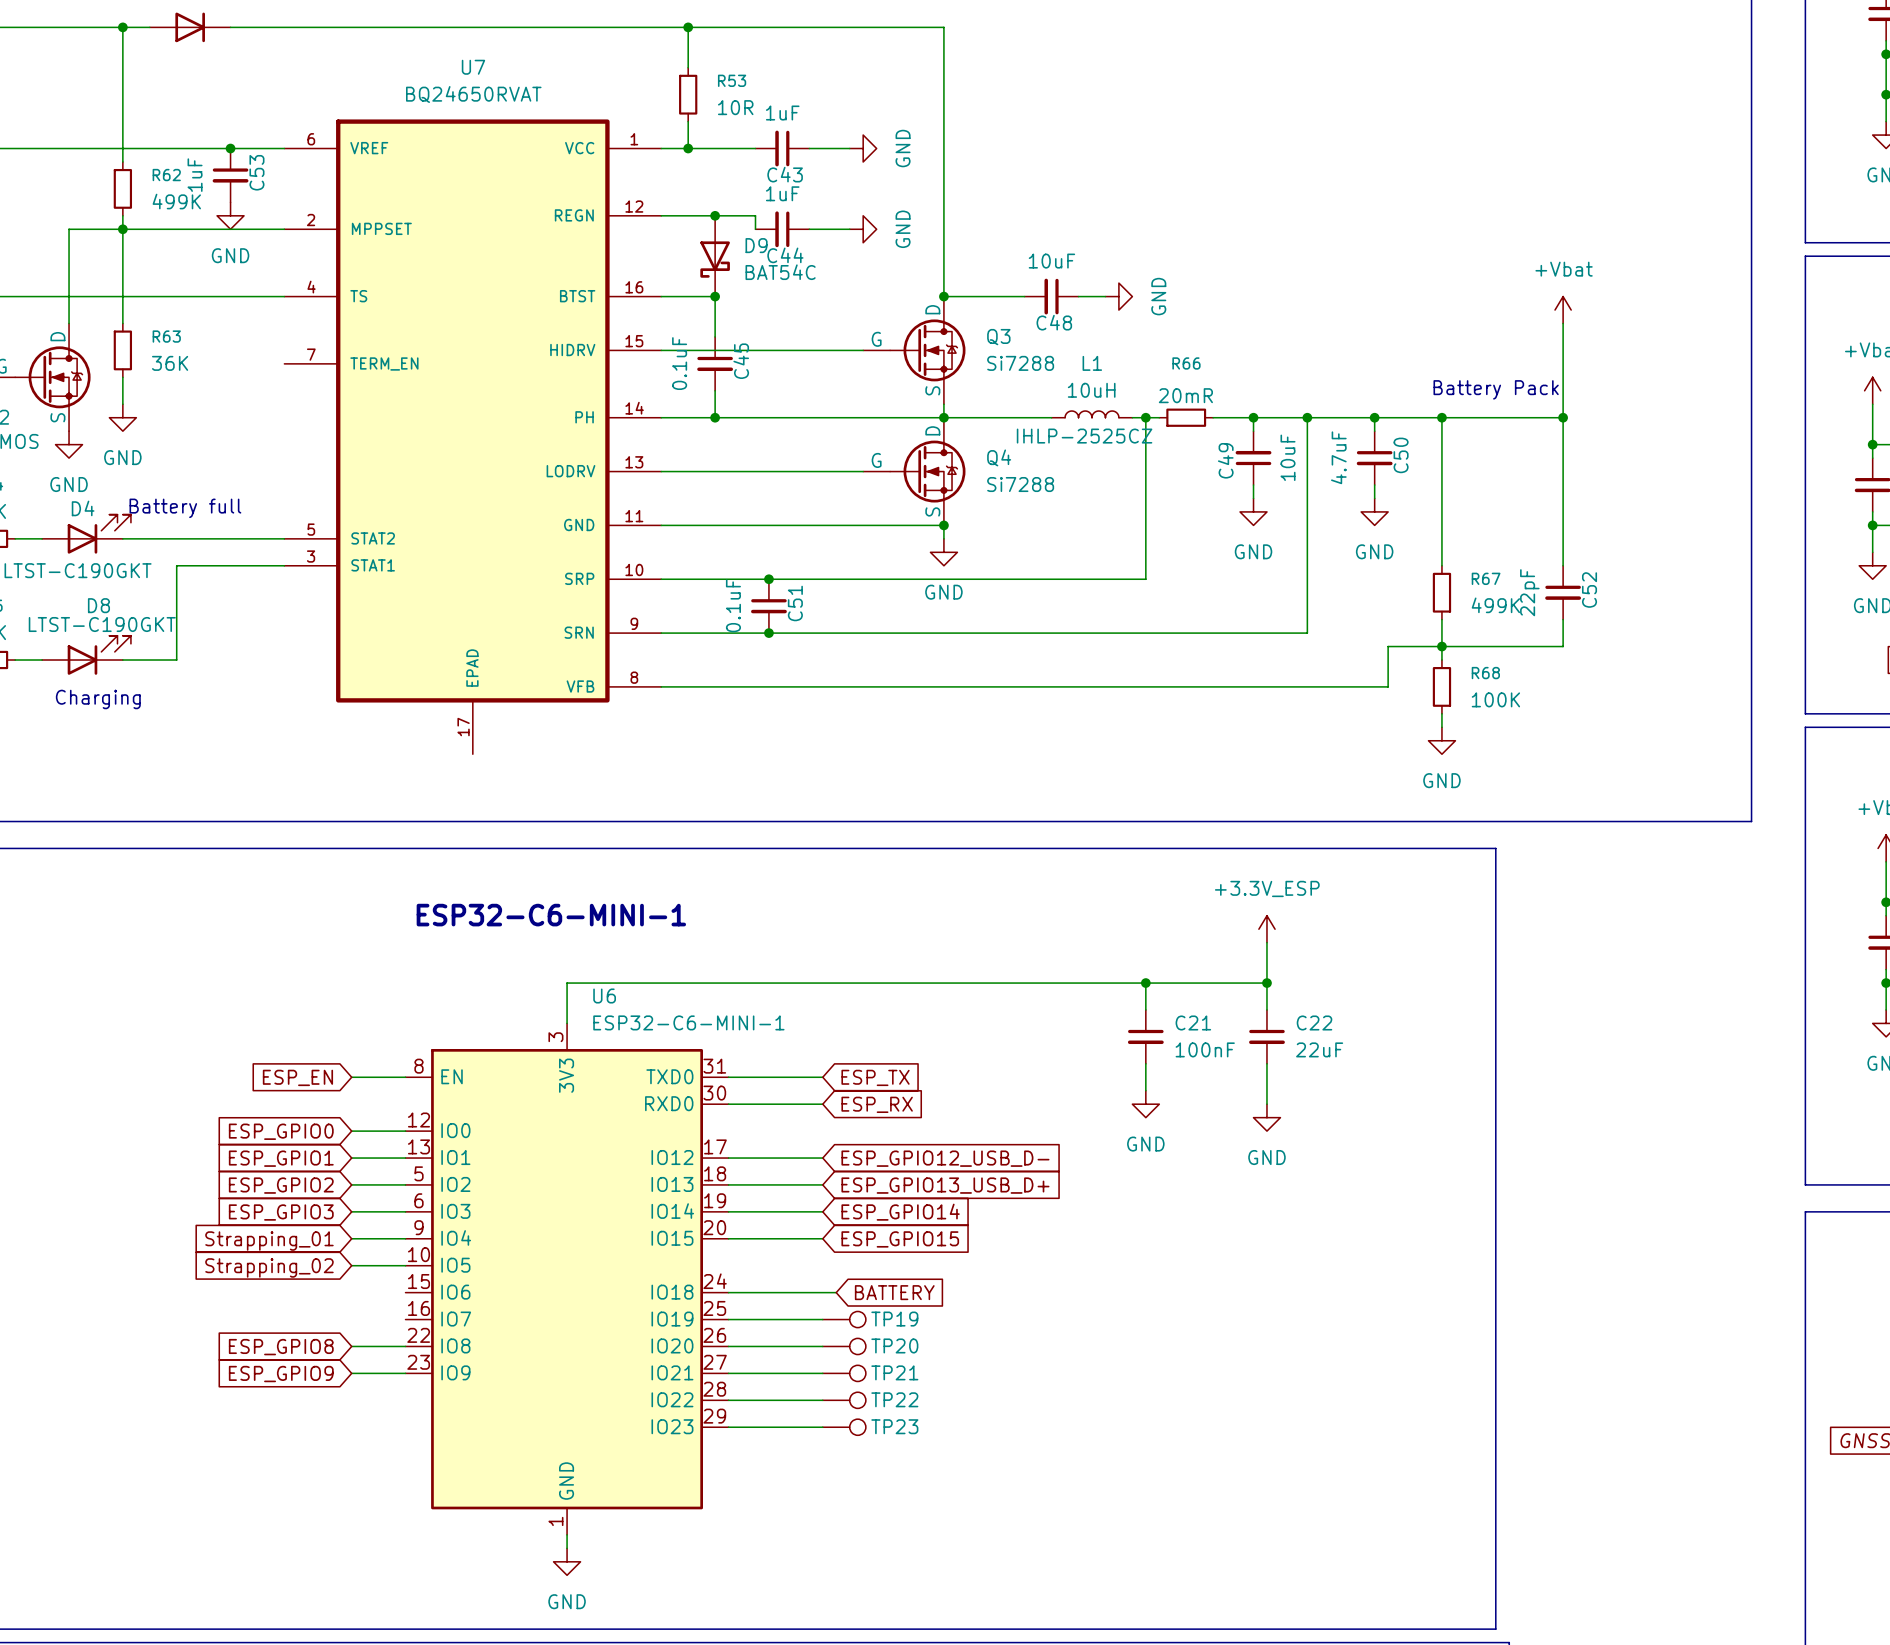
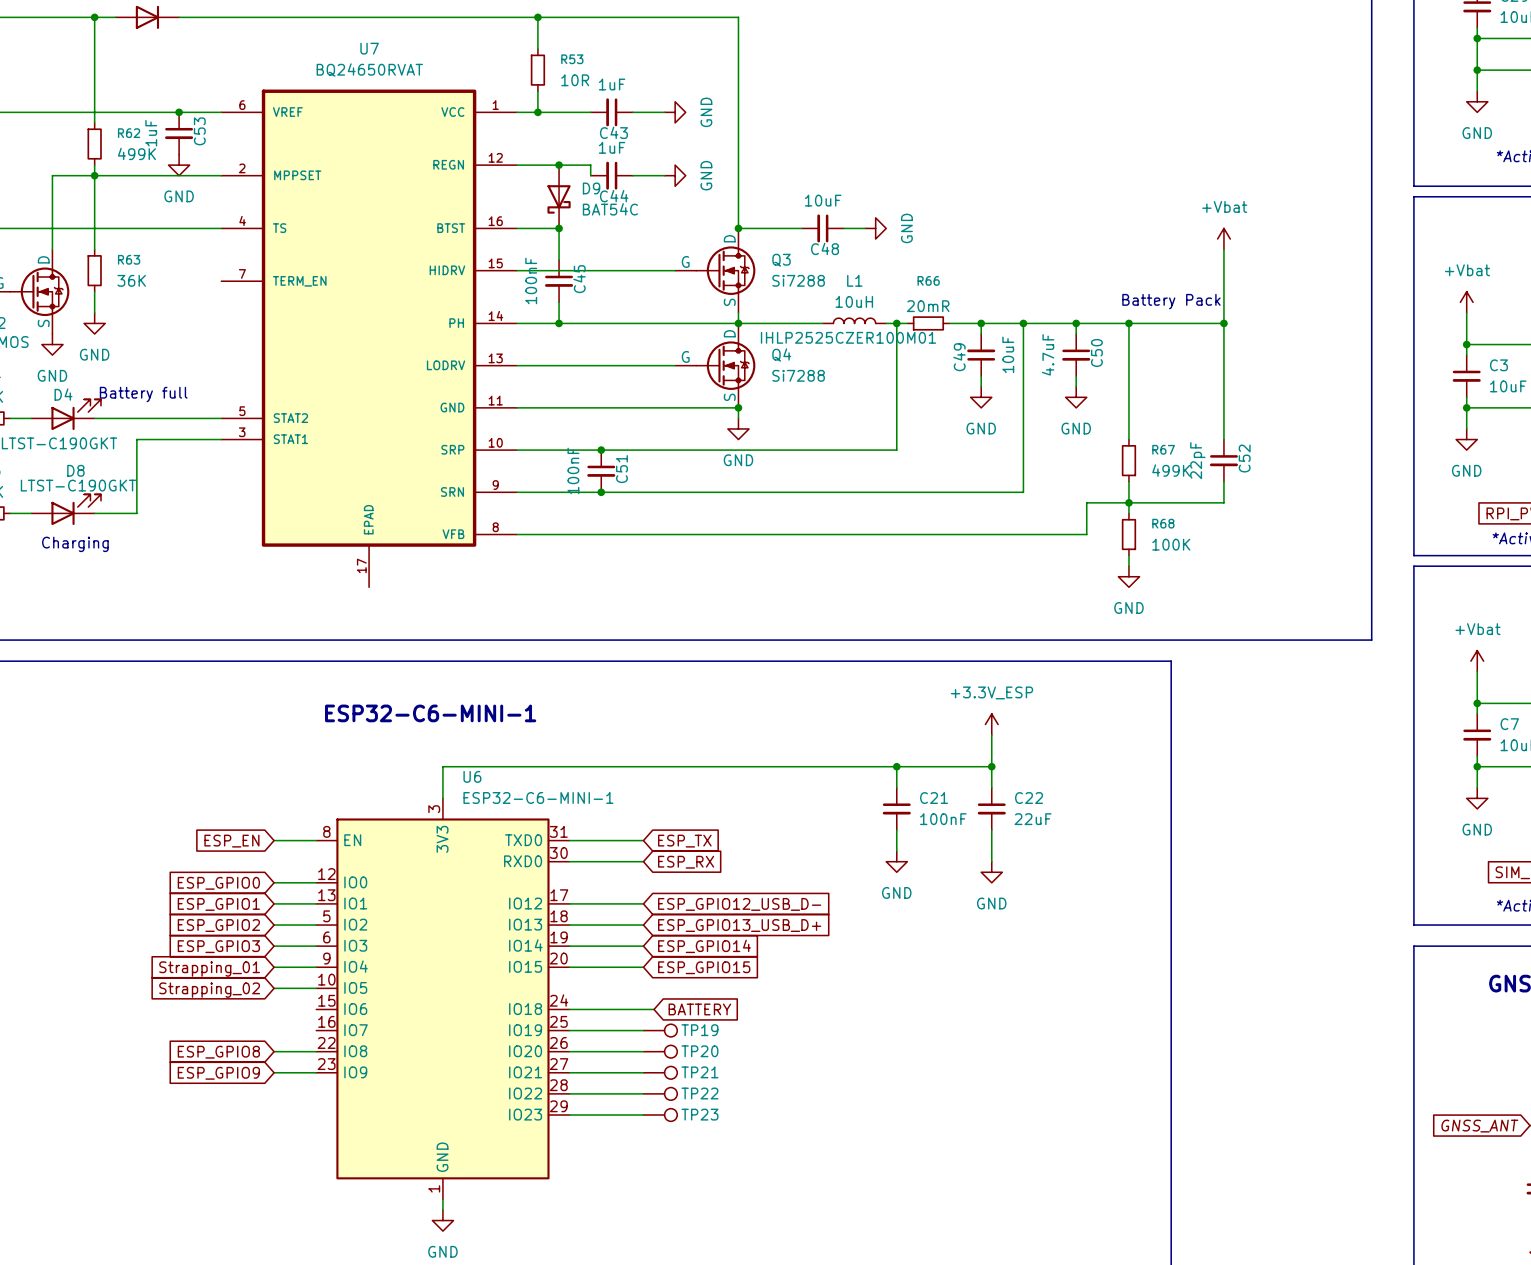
C45 value: 0.1uF (679, 363) -> 100nF (531, 280)
L1 text: IHLP-2525CZ (1084, 436) -> IHLP2525CZER100M01 (848, 337)
C51 value: 0.1uF (733, 605) -> 100nF (573, 470)

